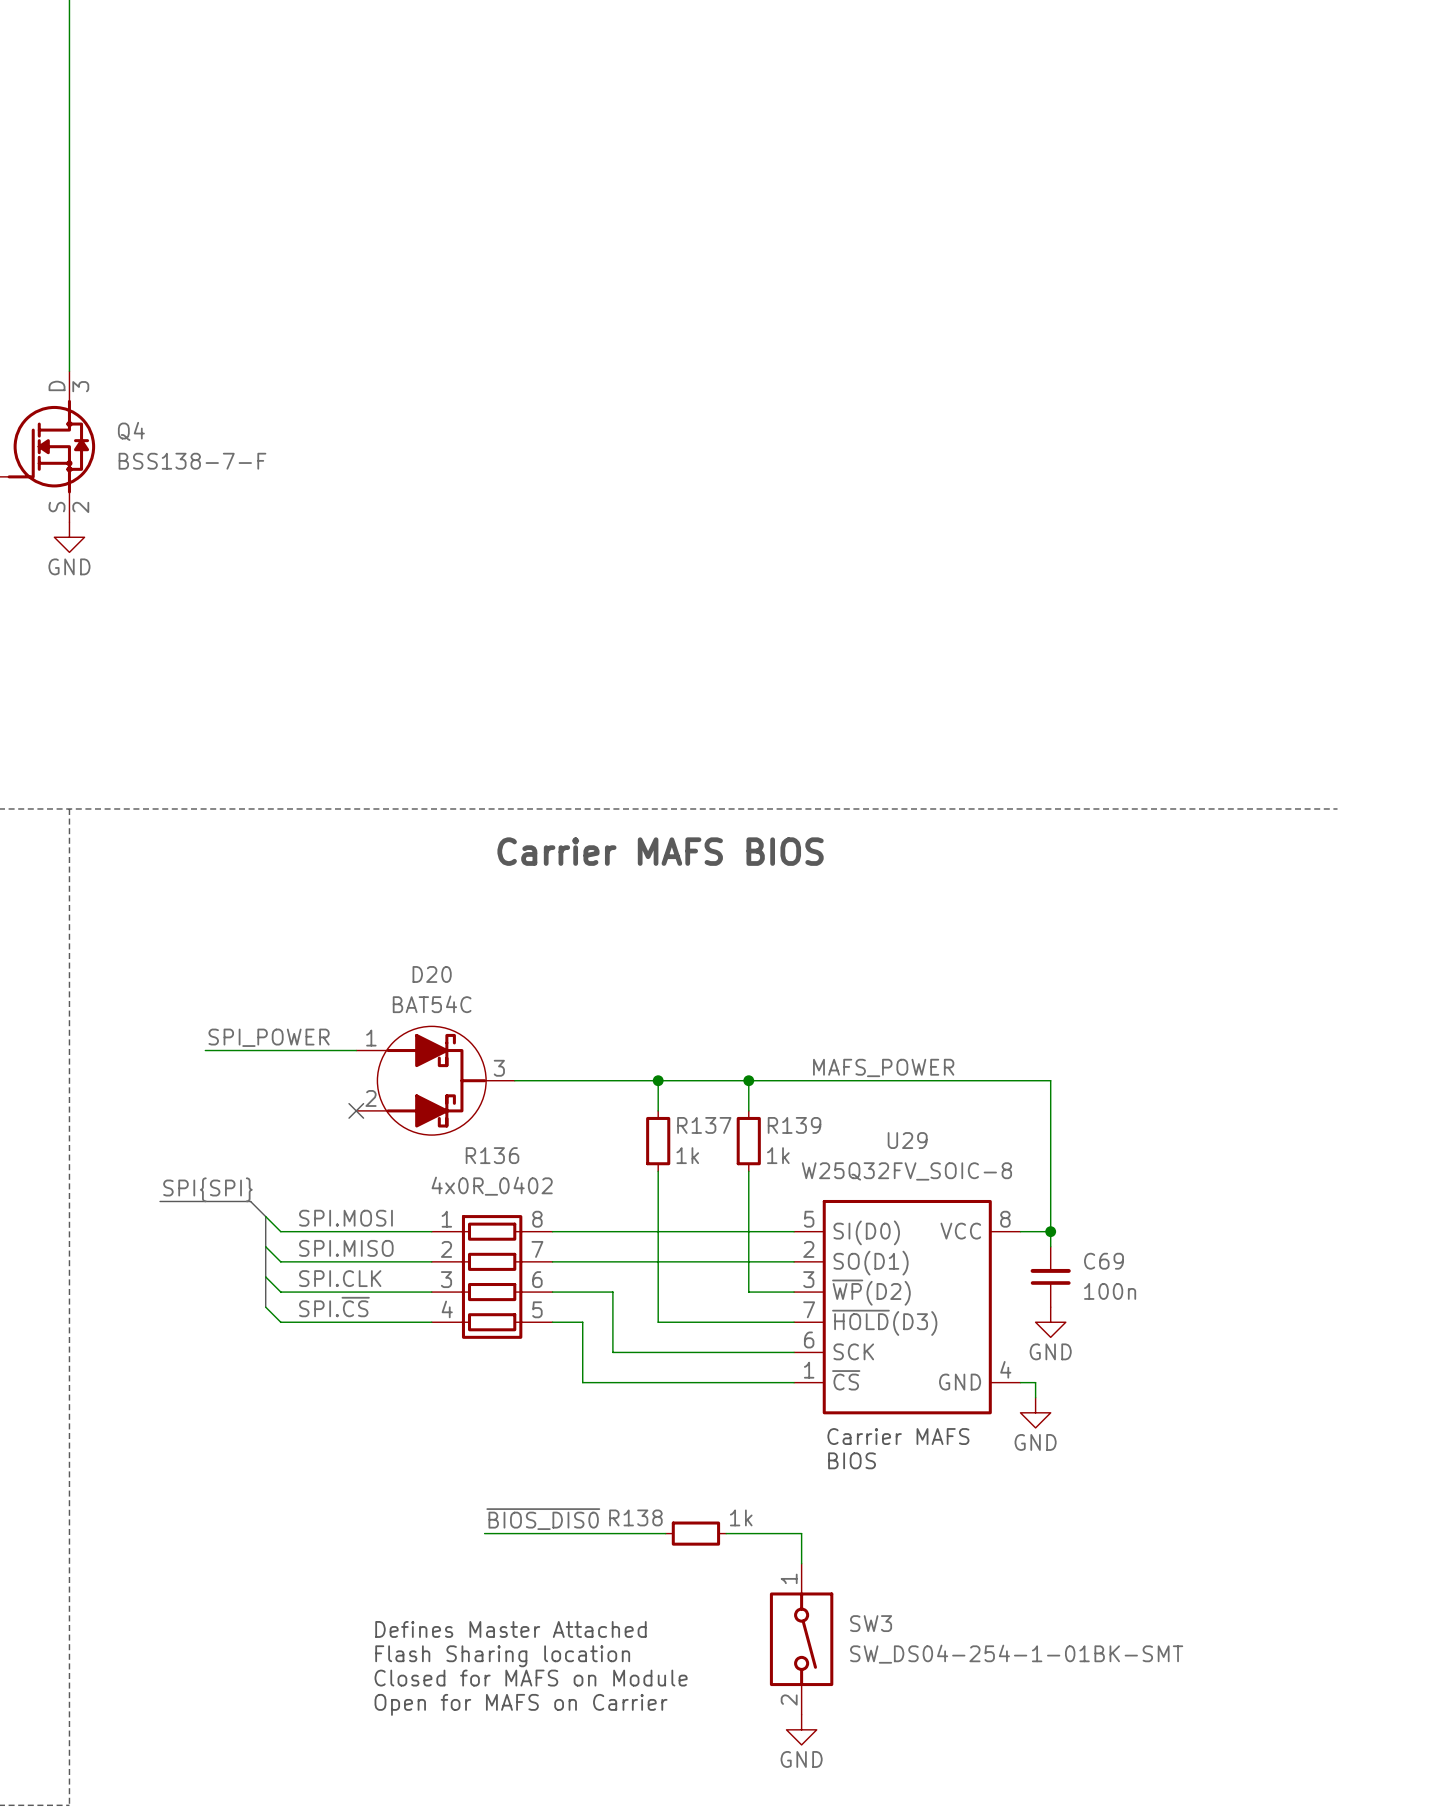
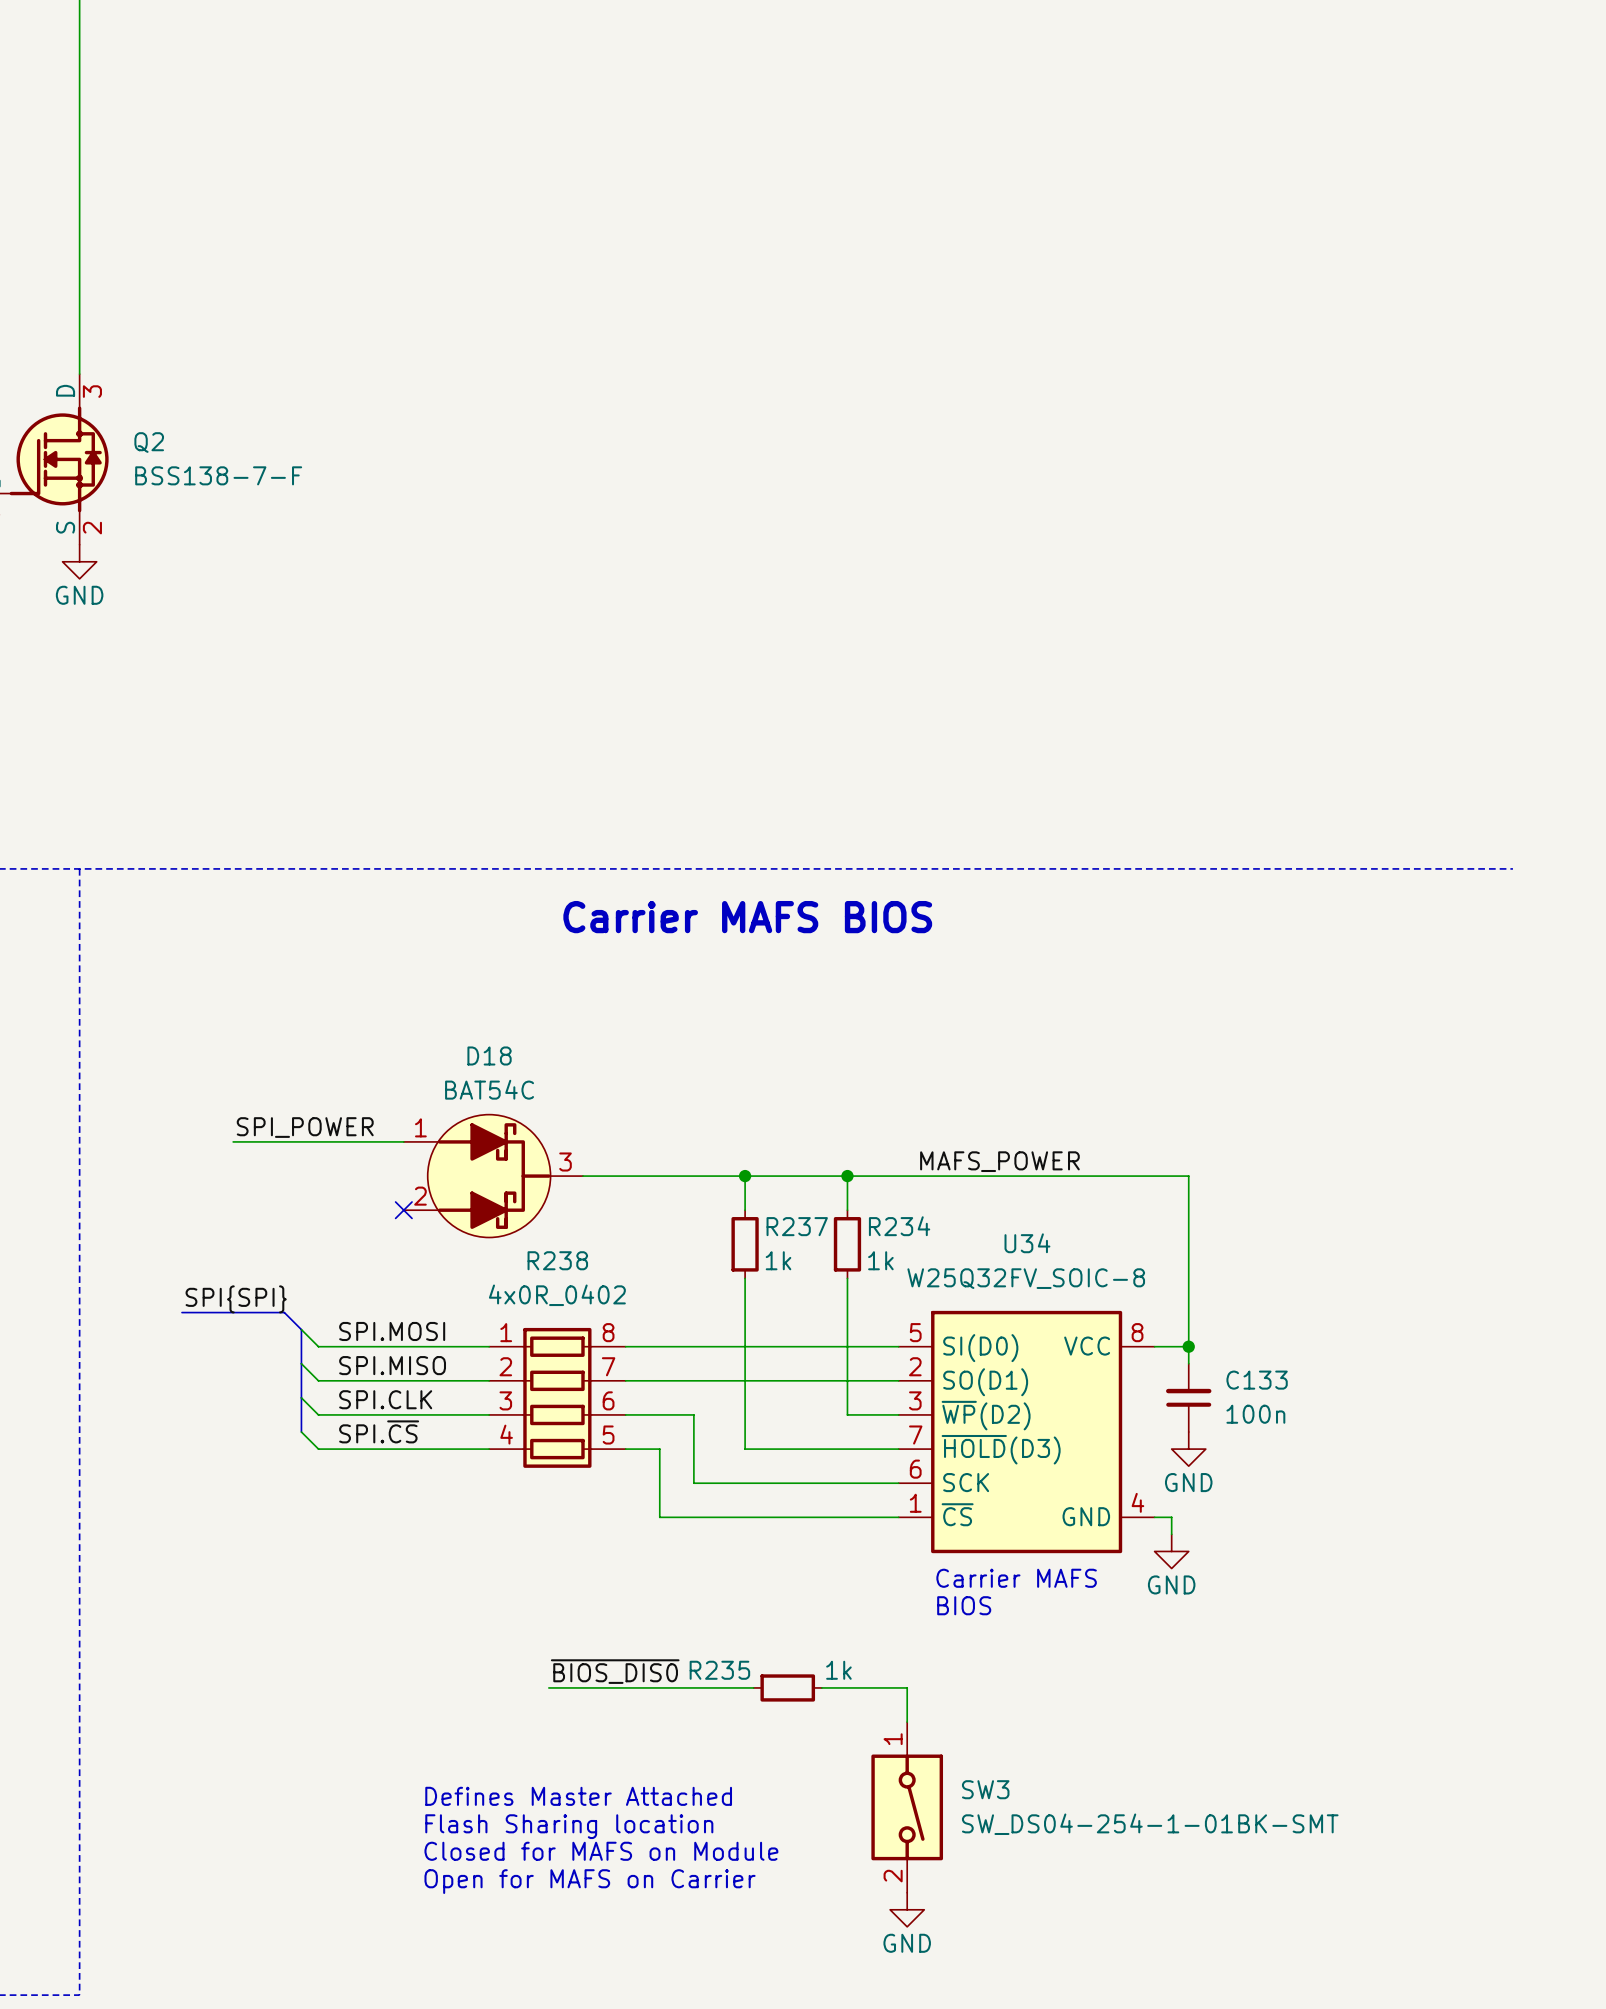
Q4 name: Q4 (131, 431) -> Q2 (149, 442)
D20 name: D20 (432, 974) -> D18 (489, 1055)
R137 name: R137 (704, 1125) -> R237 (797, 1226)
R139 name: R139 (794, 1125) -> R234 (899, 1226)
U29 name: U29 (907, 1140) -> U34 (1027, 1243)
R136 name: R136 (492, 1155) -> R238 (557, 1260)
C69 name: C69 (1103, 1261) -> C133 (1257, 1380)
R138 name: R138 (635, 1517) -> R235 (719, 1670)

